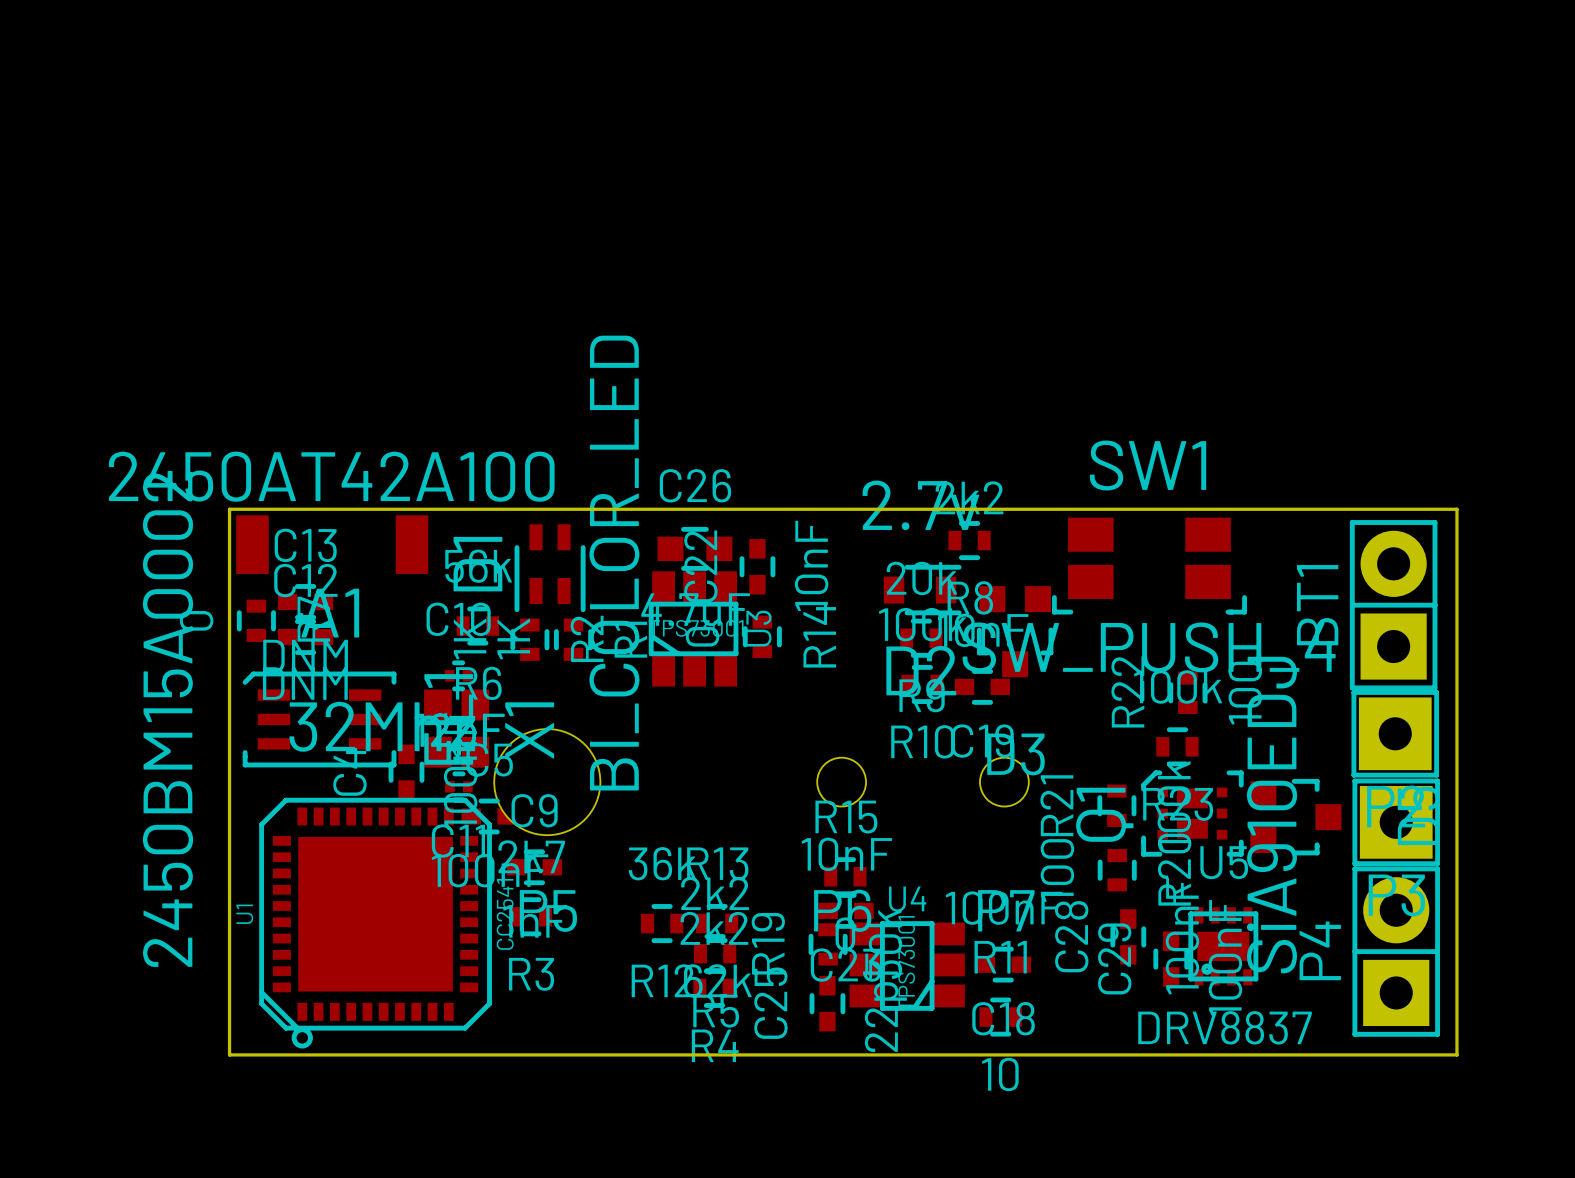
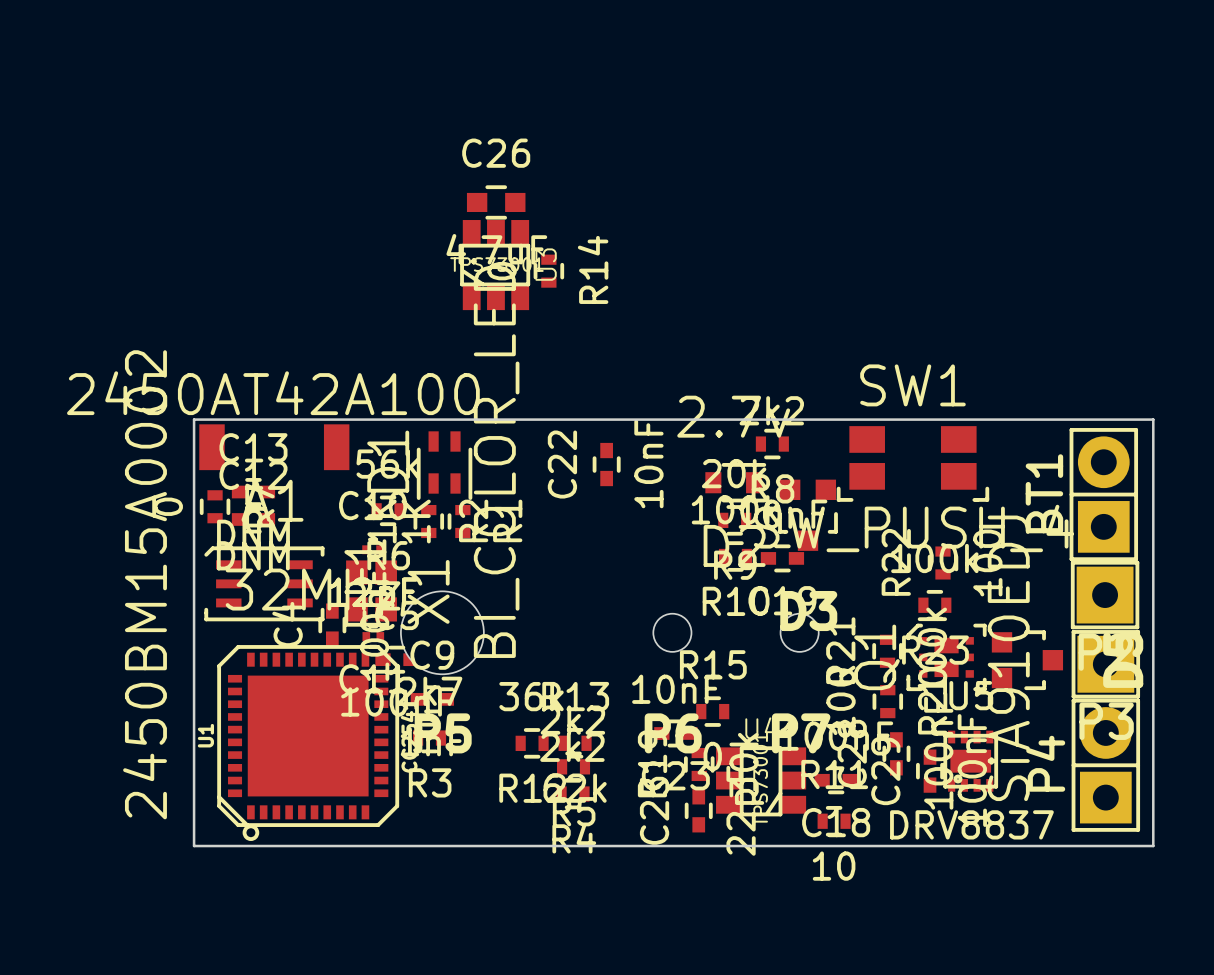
C26 position: (694, 548) -> (496, 202)
U3 position: (693, 628) -> (495, 265)
R14 position: (762, 636) -> (548, 271)
R15 position: (845, 876) -> (712, 711)
R19 position: (828, 944) -> (699, 764)
C18 position: (1003, 964) -> (836, 780)
U4 position: (907, 965) -> (761, 781)
C25 position: (827, 1003) -> (698, 810)
R11 position: (1000, 1017) -> (834, 821)

